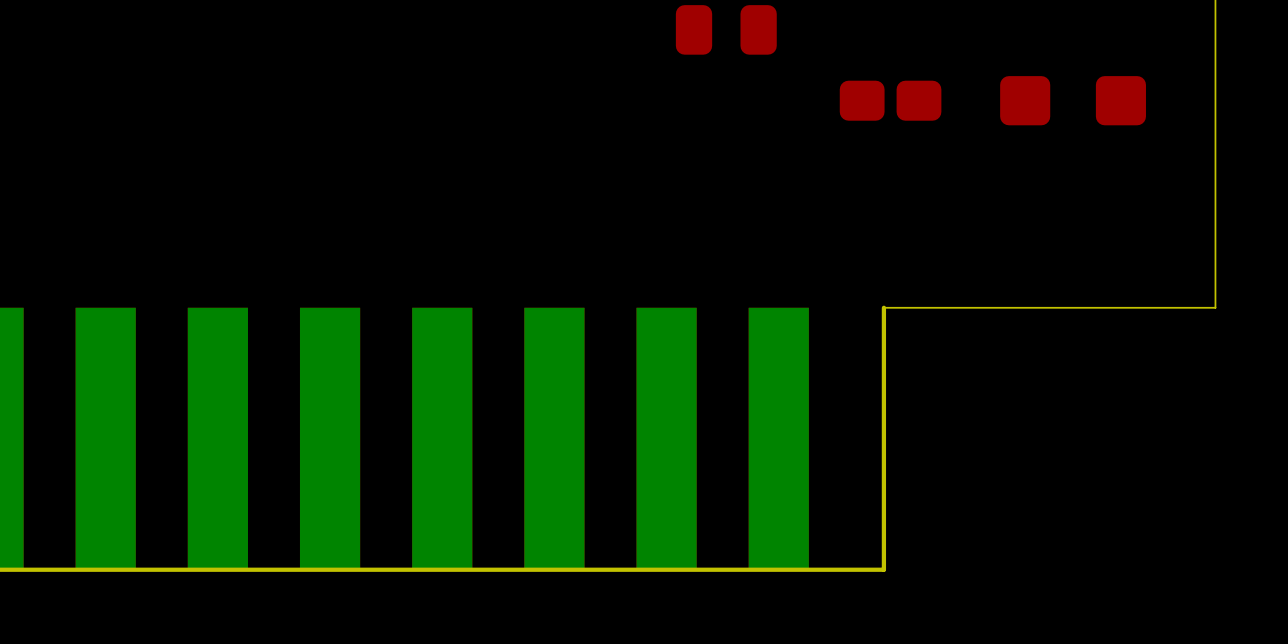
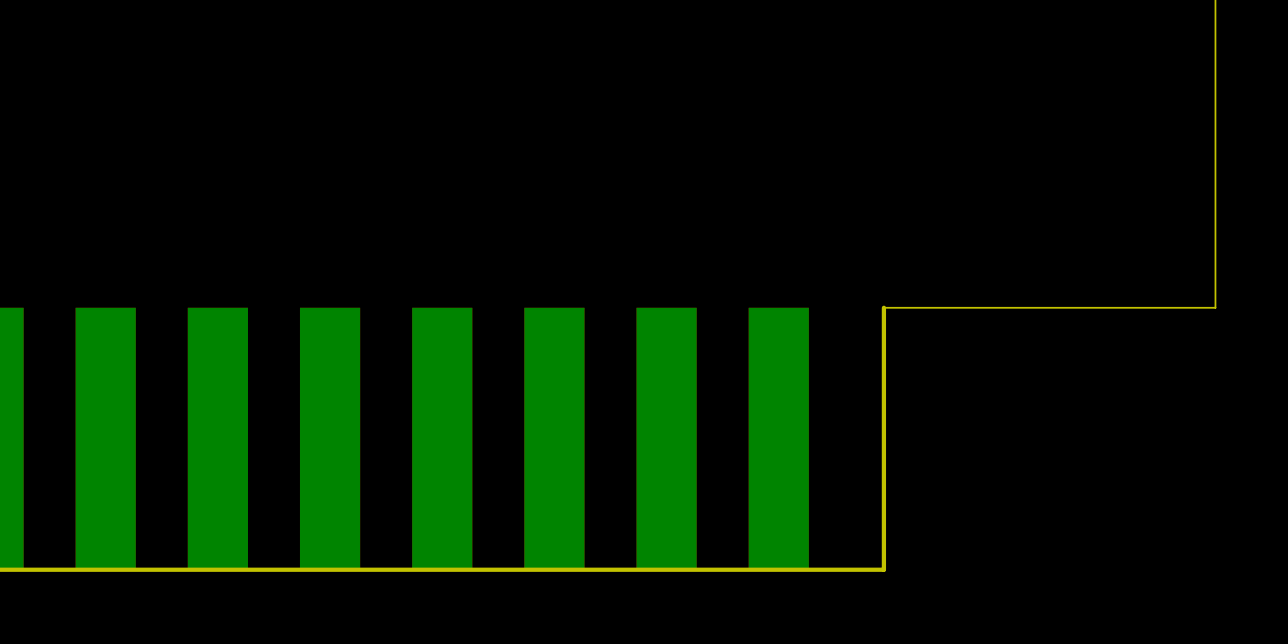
part: (726, 29) -> none
part: (890, 100) -> none
part: (1073, 100) -> none

